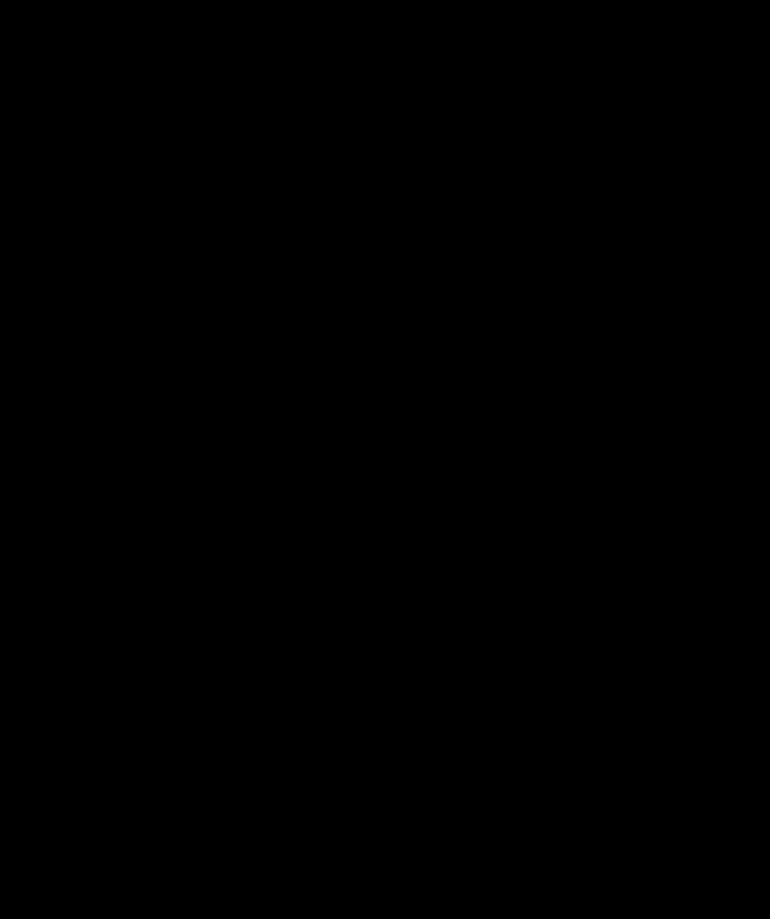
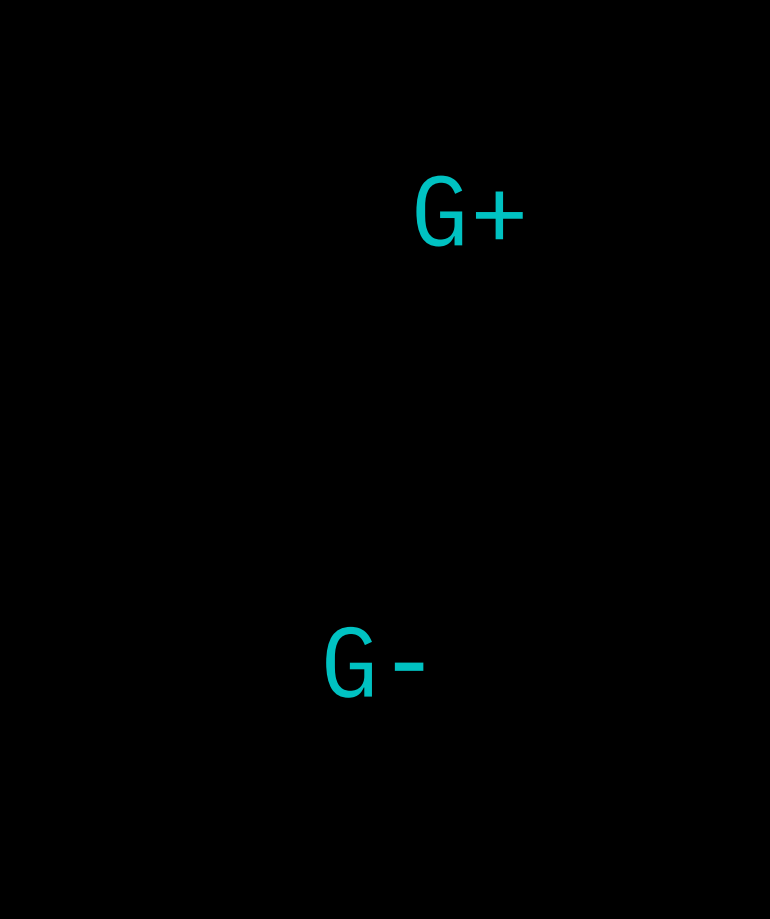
text: none -> G+ (469, 211)
text: none -> G- (374, 662)

